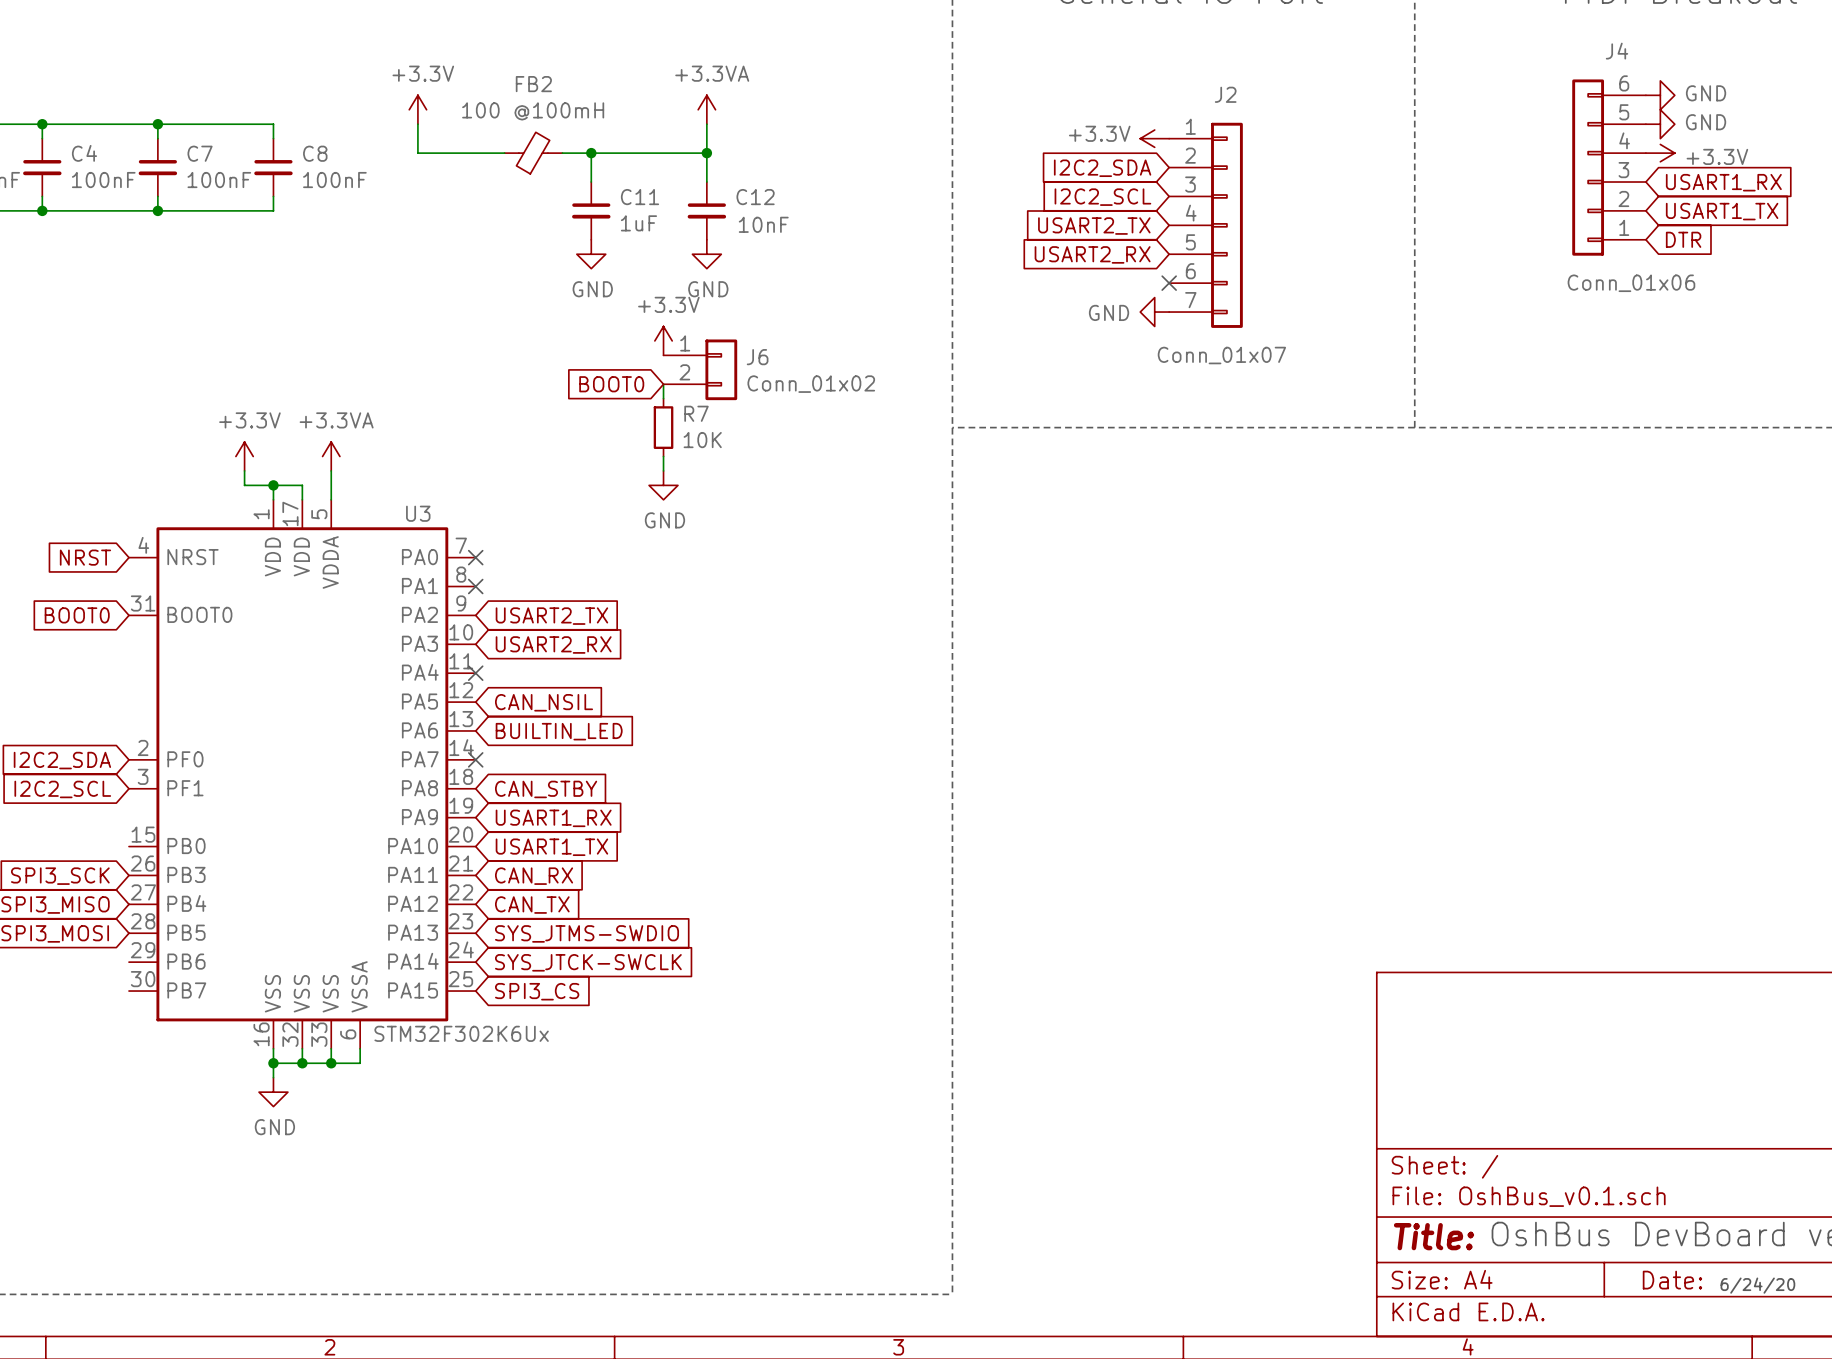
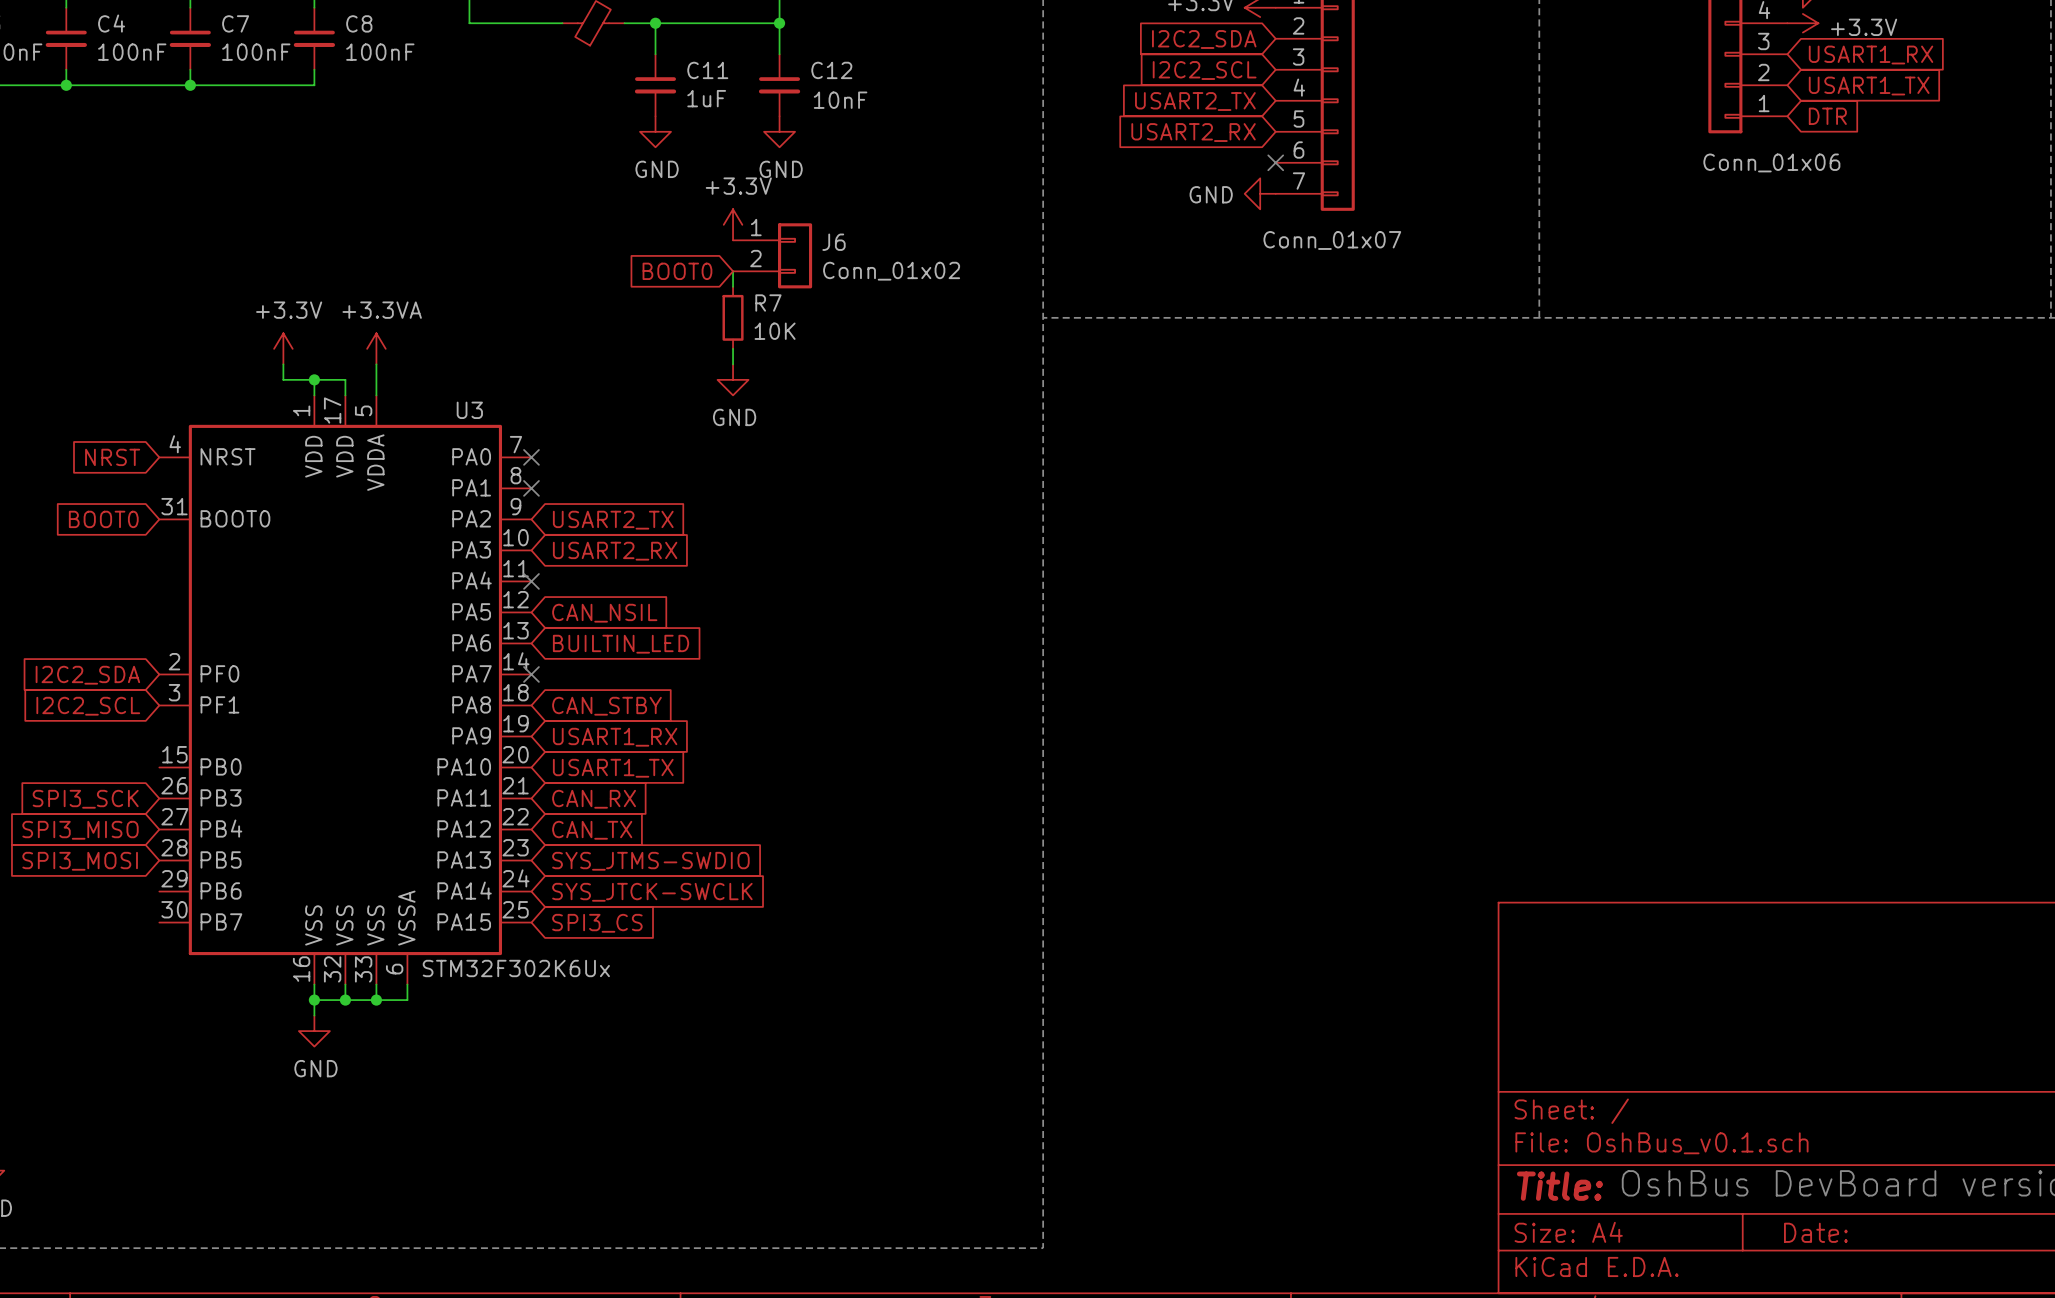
text: 6/24/20 (1757, 1285) -> none

